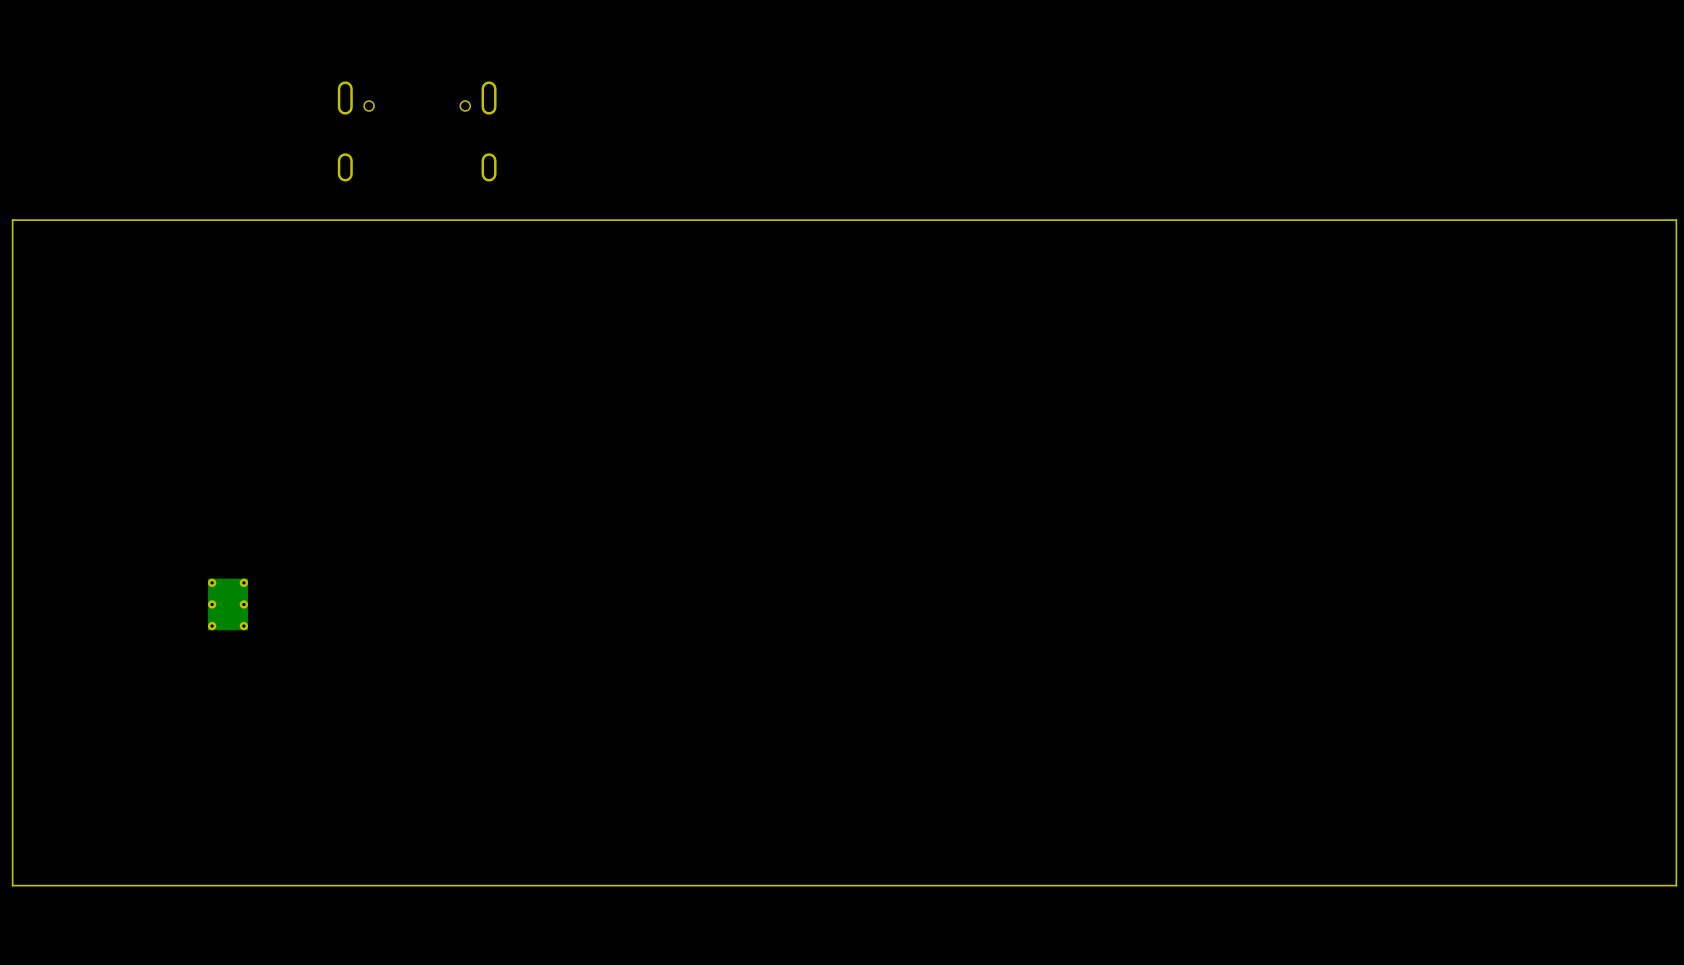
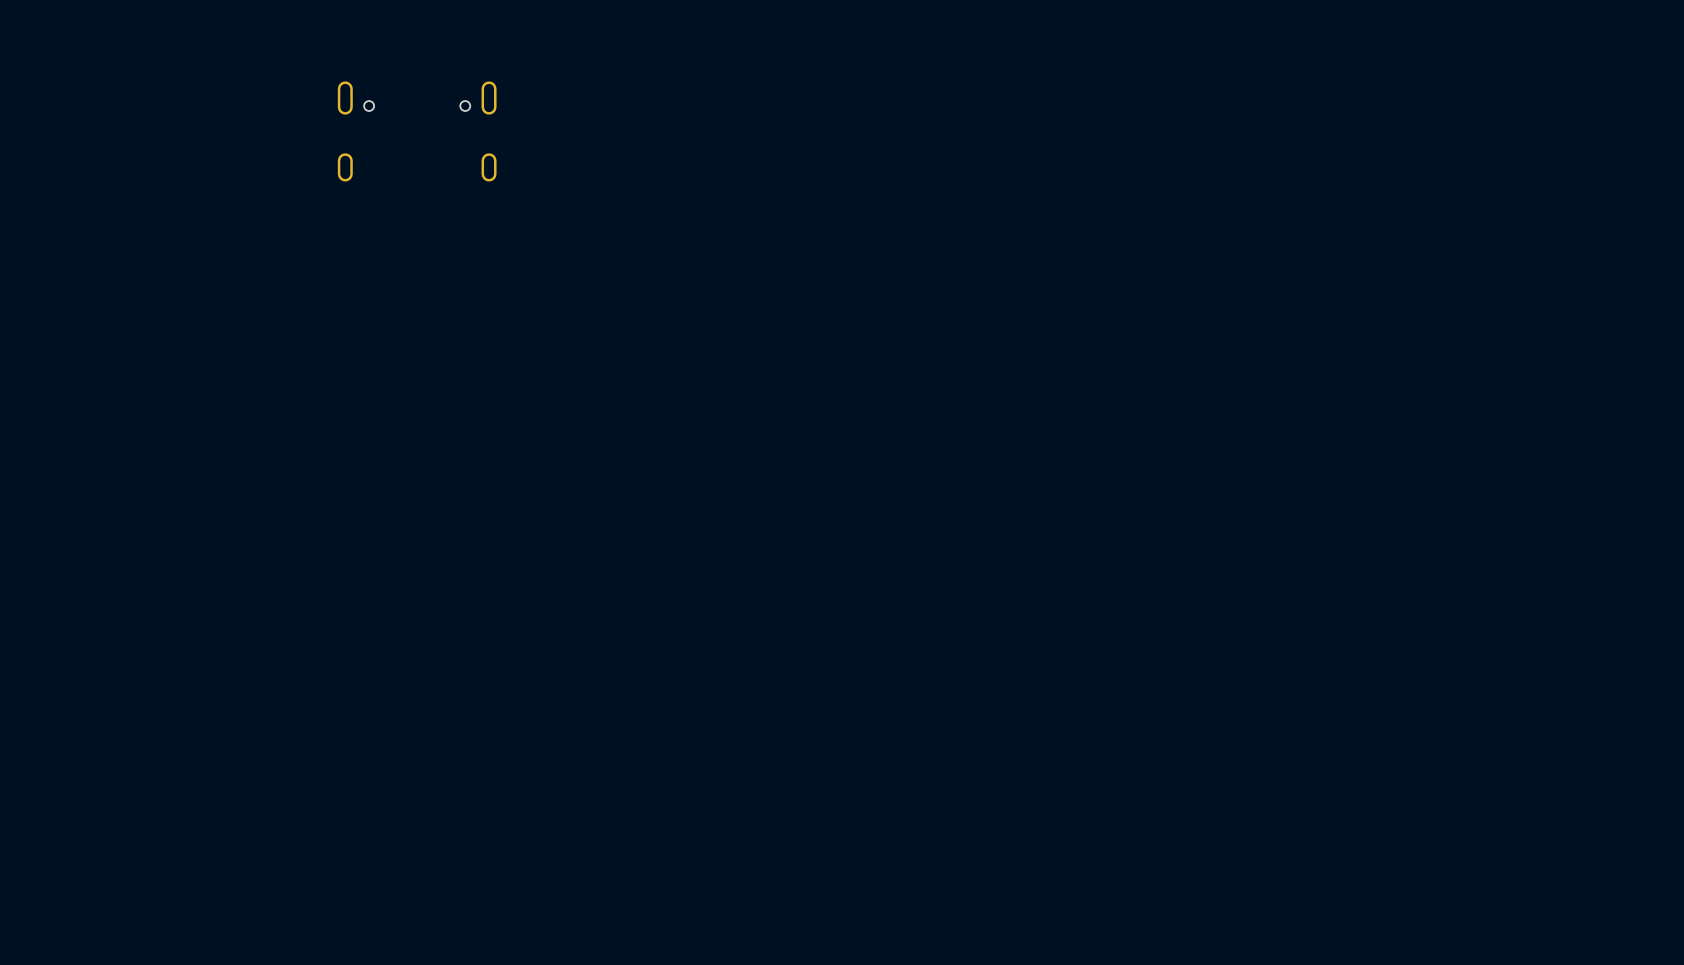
board edge: (1676, 220) (12, 220) (12, 885) (1676, 885) (1676, 220) -> none
part: (228, 604) -> none

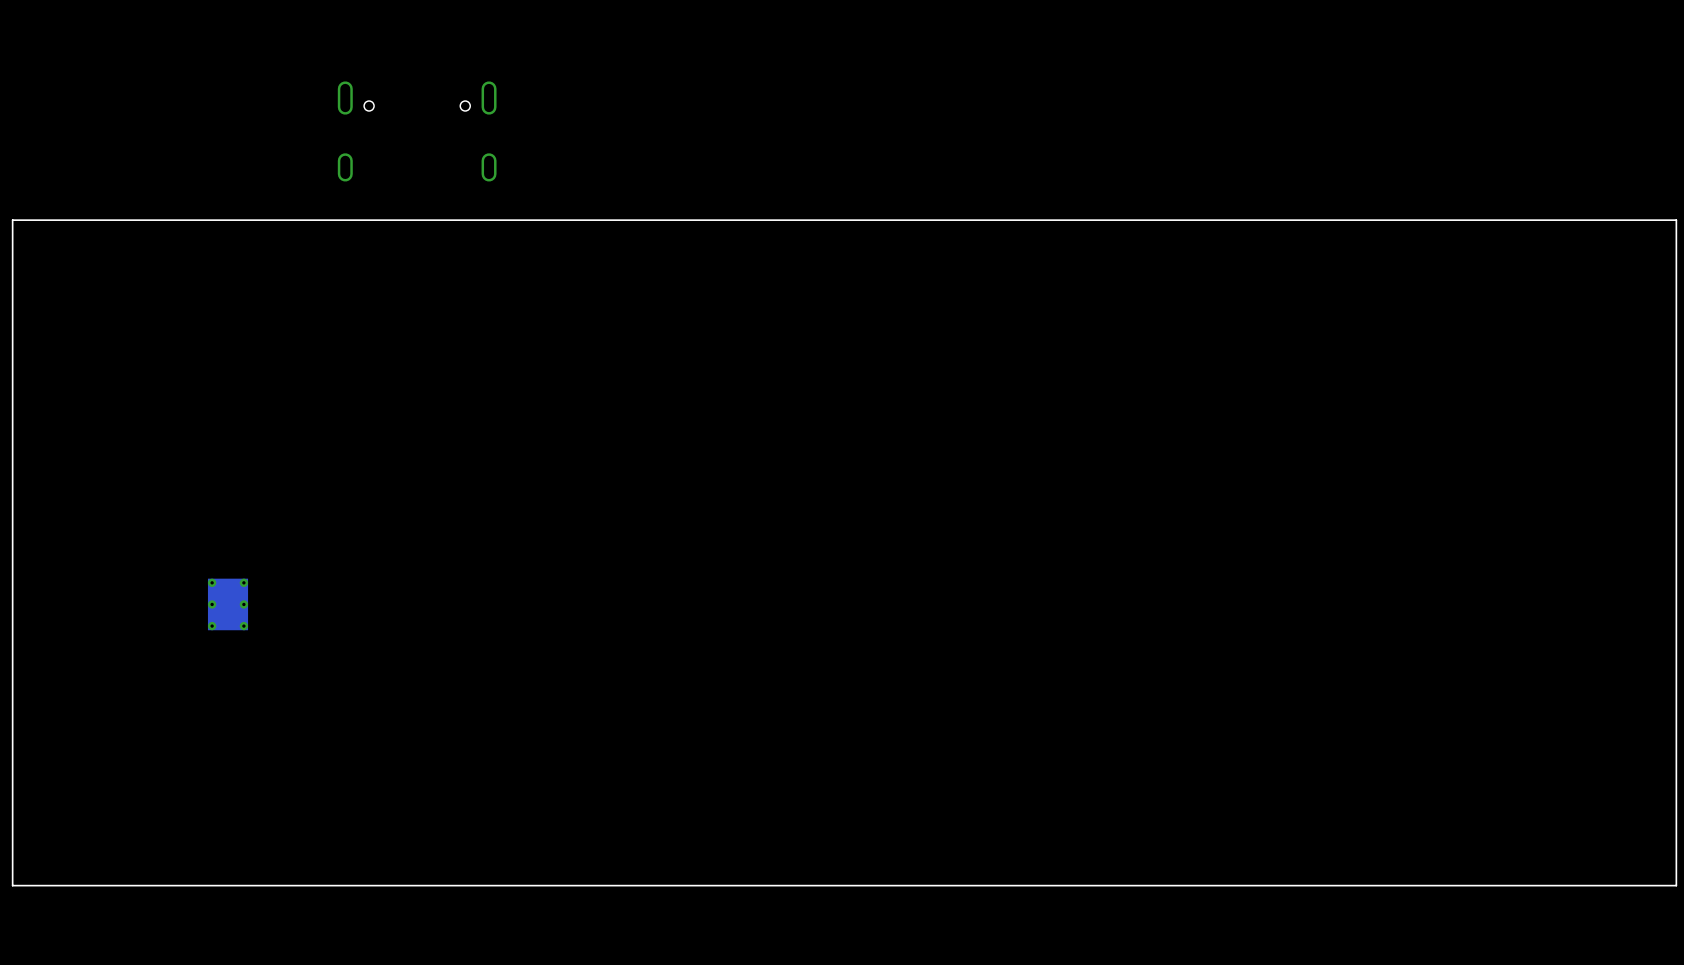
board edge: none -> (1676, 220) (12, 220) (12, 885) (1676, 885) (1676, 220)
part: none -> (228, 604)

